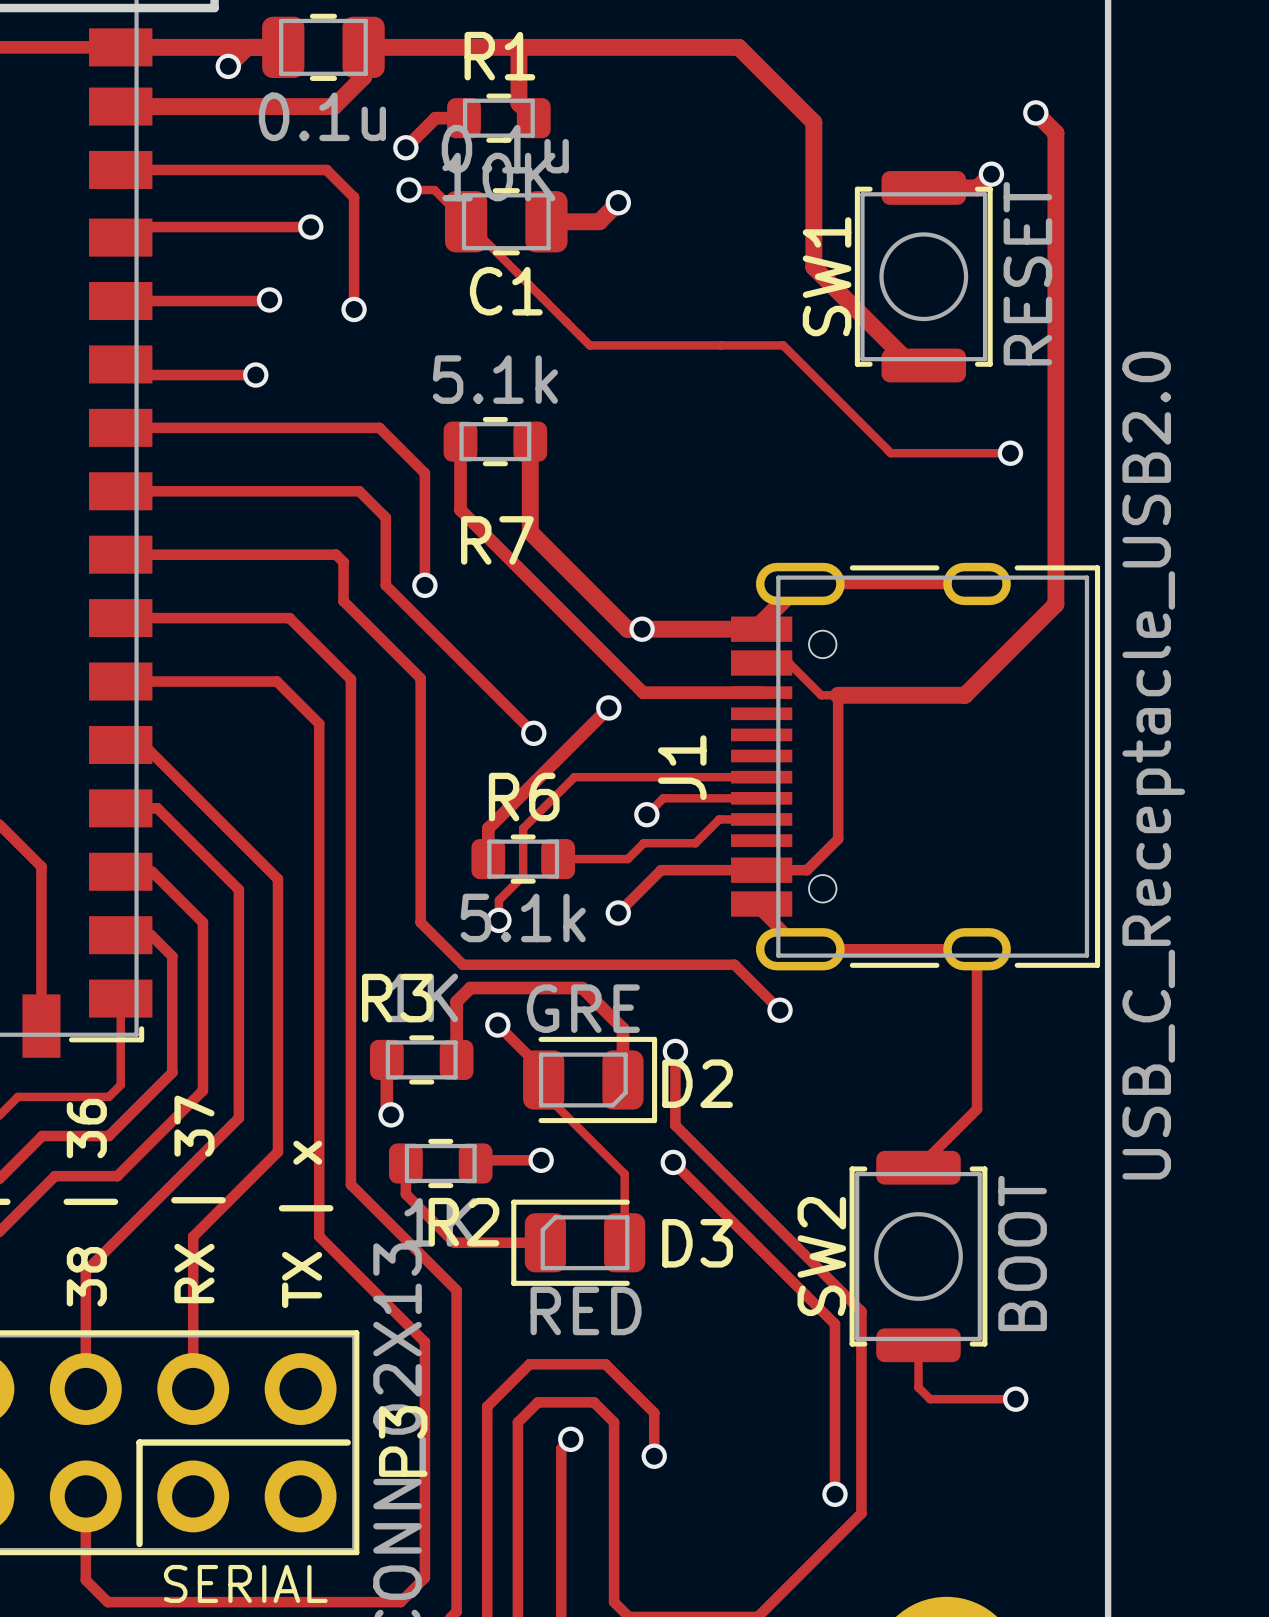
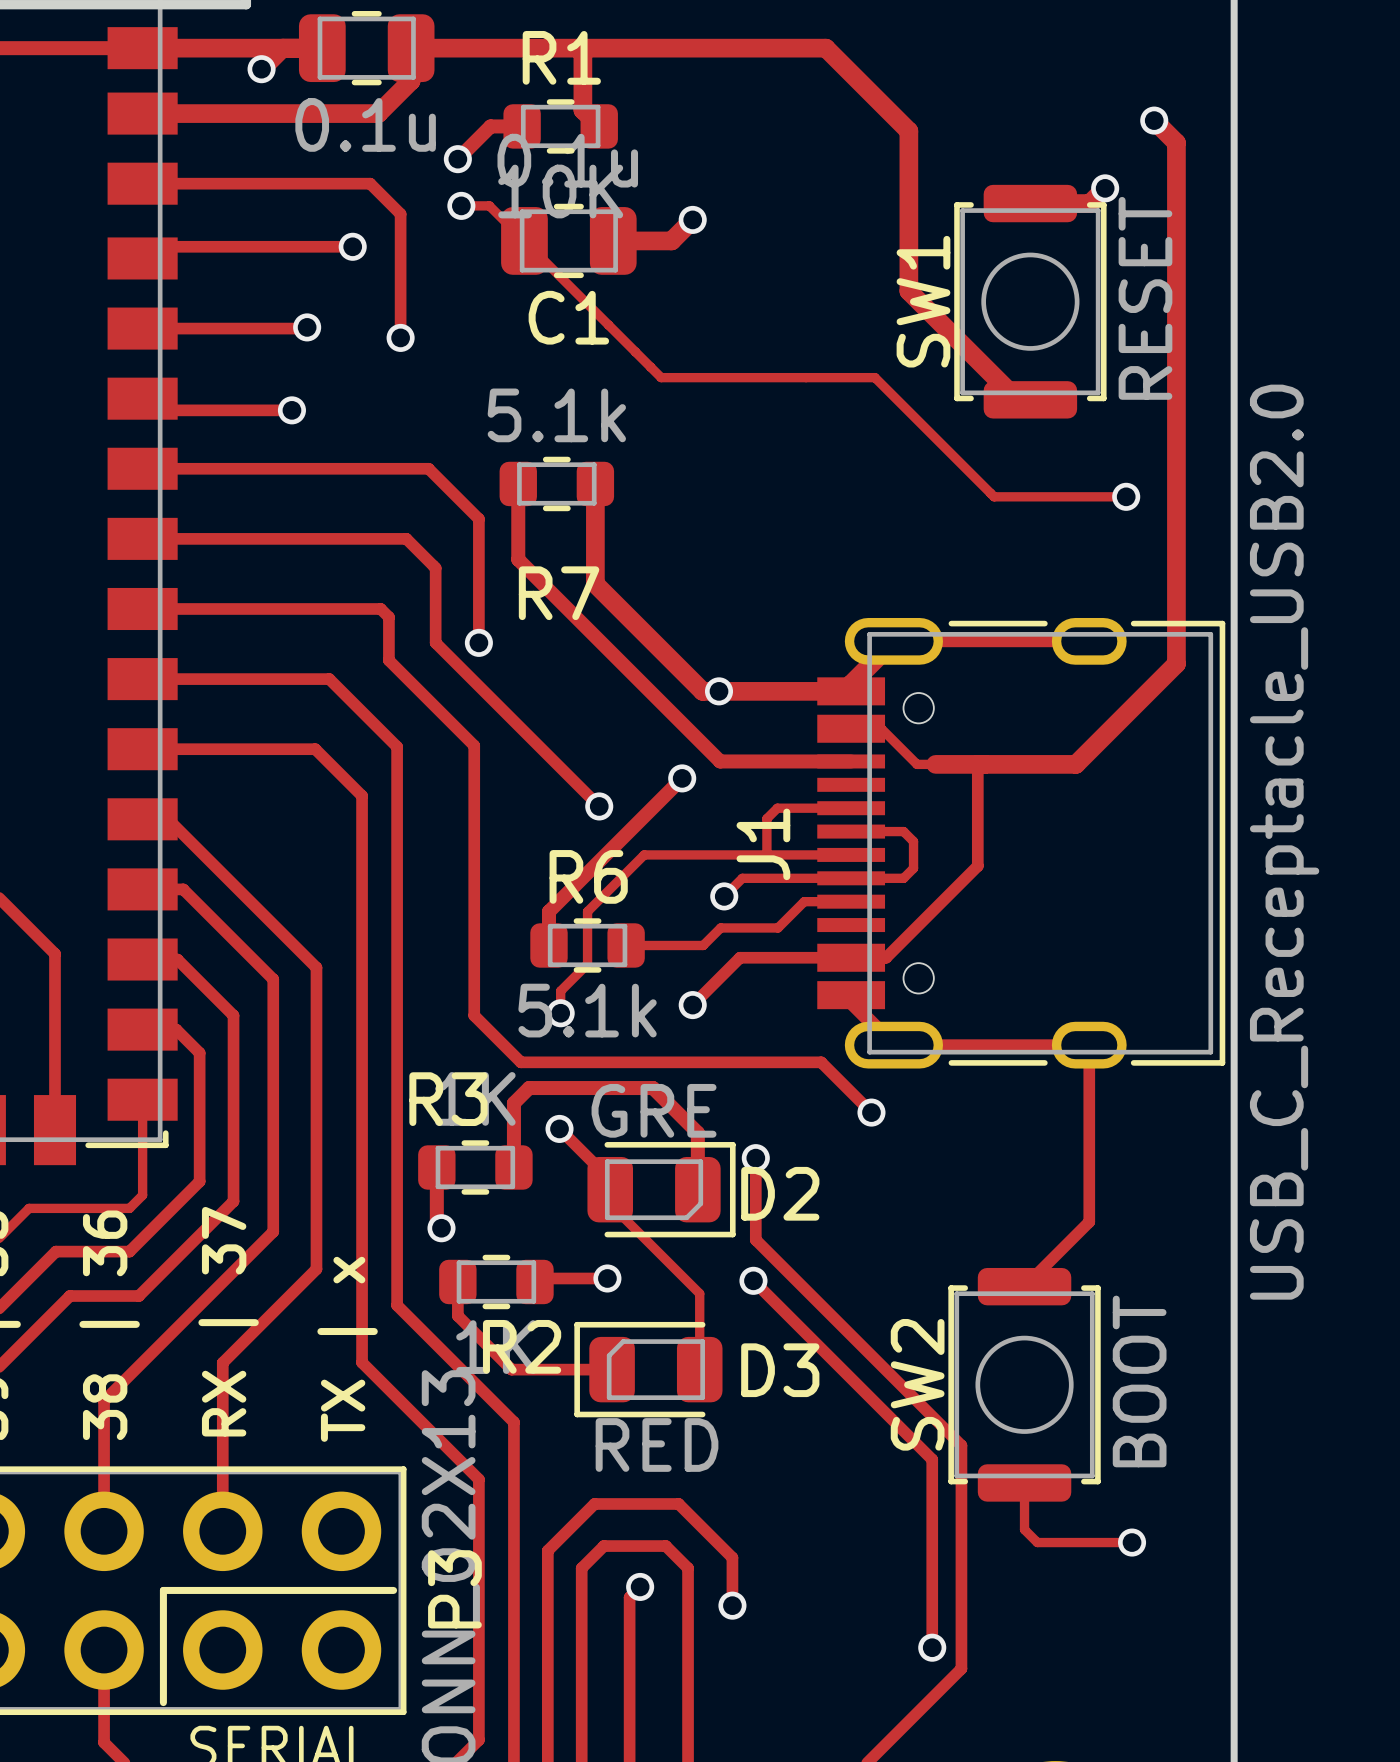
track: (838, 695) (838, 839) (806, 870) (793, 870) -> (977, 764) (977, 866) (886, 957)
track: none -> (851, 808) (777, 808) (766, 818) (766, 854)
track: none -> (851, 831) (903, 831) (913, 841) (913, 868) (903, 878) (851, 878)

